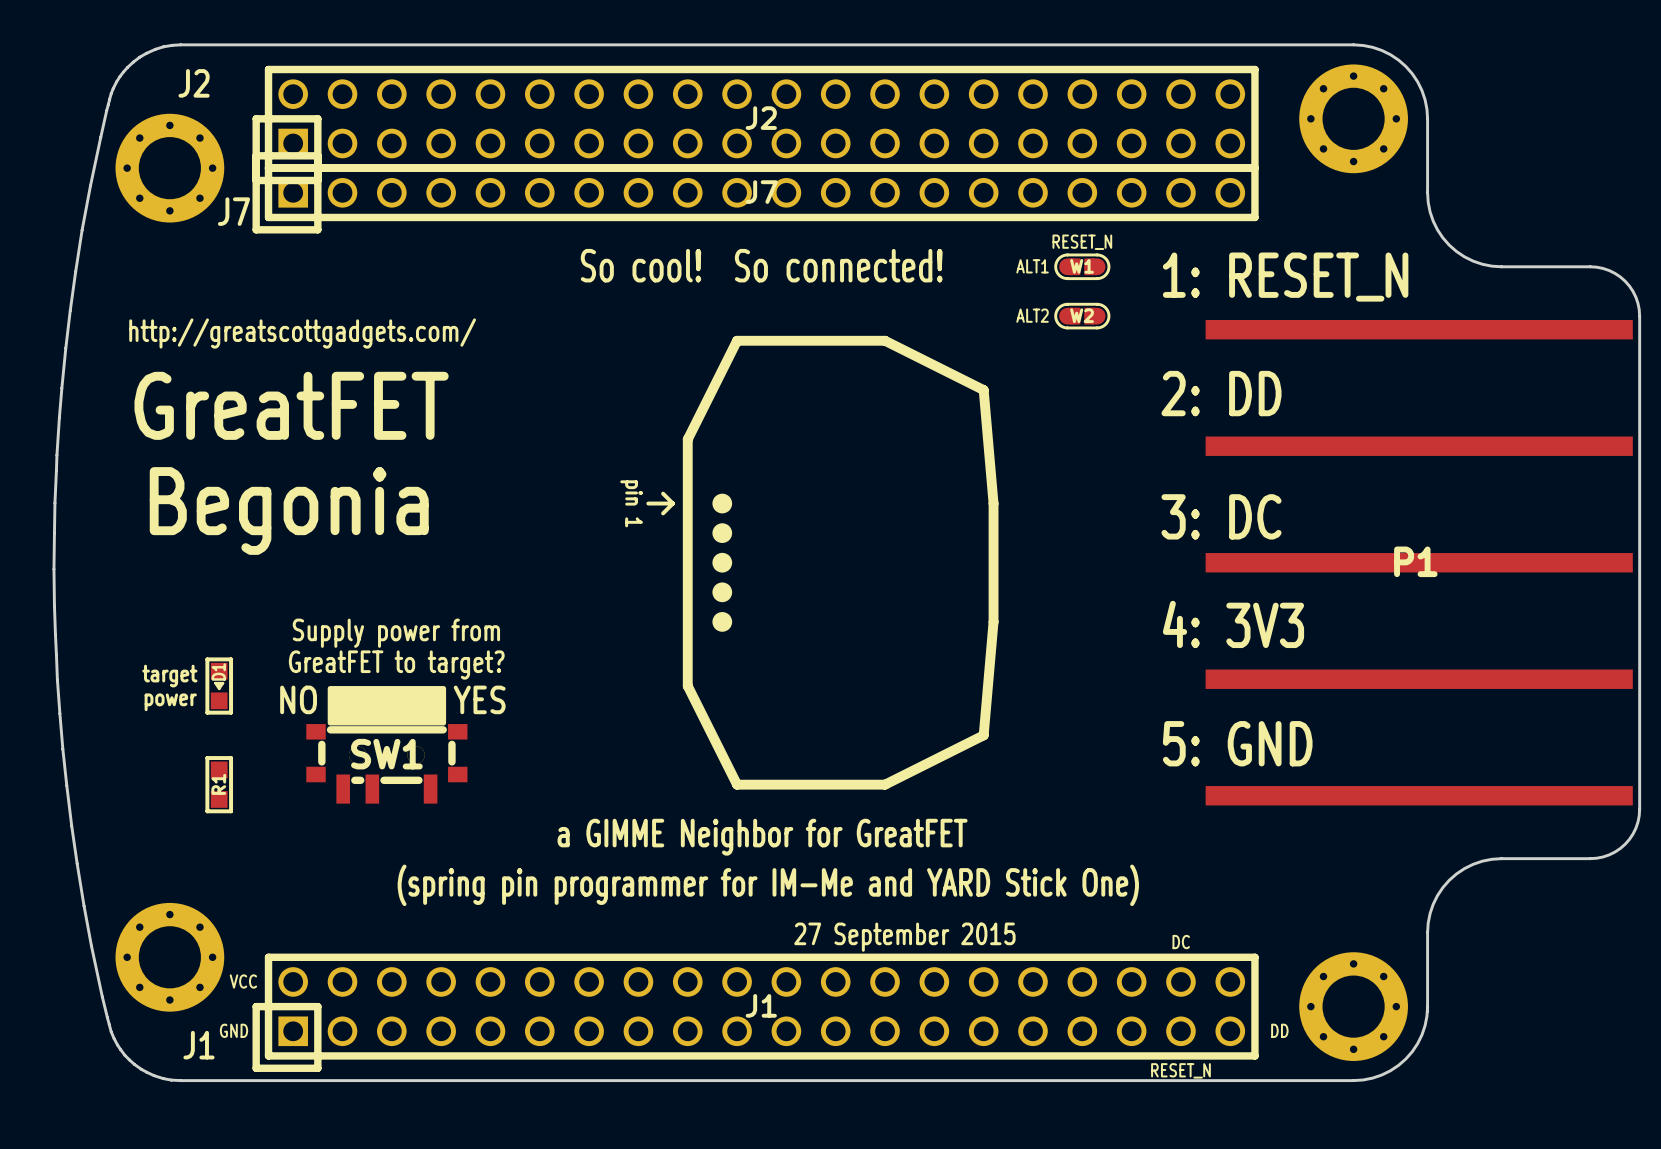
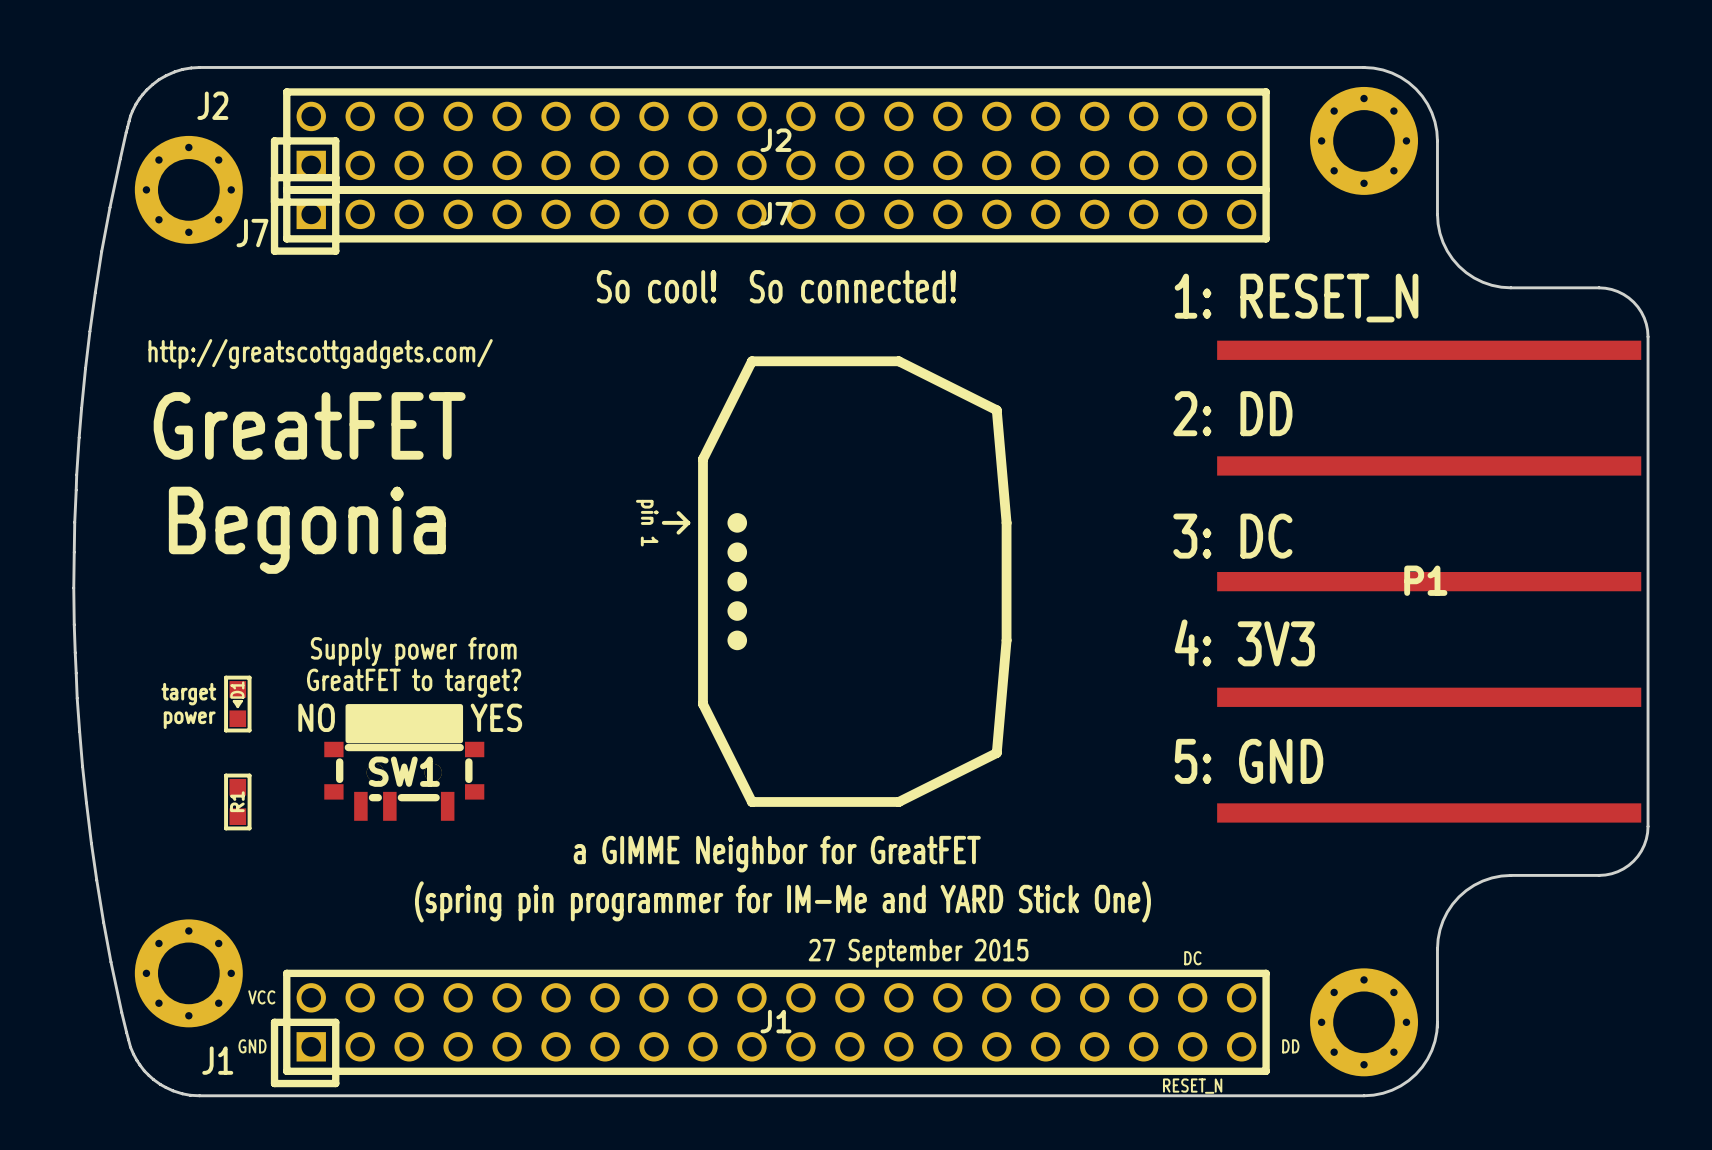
text: RESET_N (1082, 242) -> none
text: ALT1 (1032, 266) -> none
W1: (1082, 266) -> none
text: ALT2 (1032, 315) -> none
W2: (1082, 316) -> none

